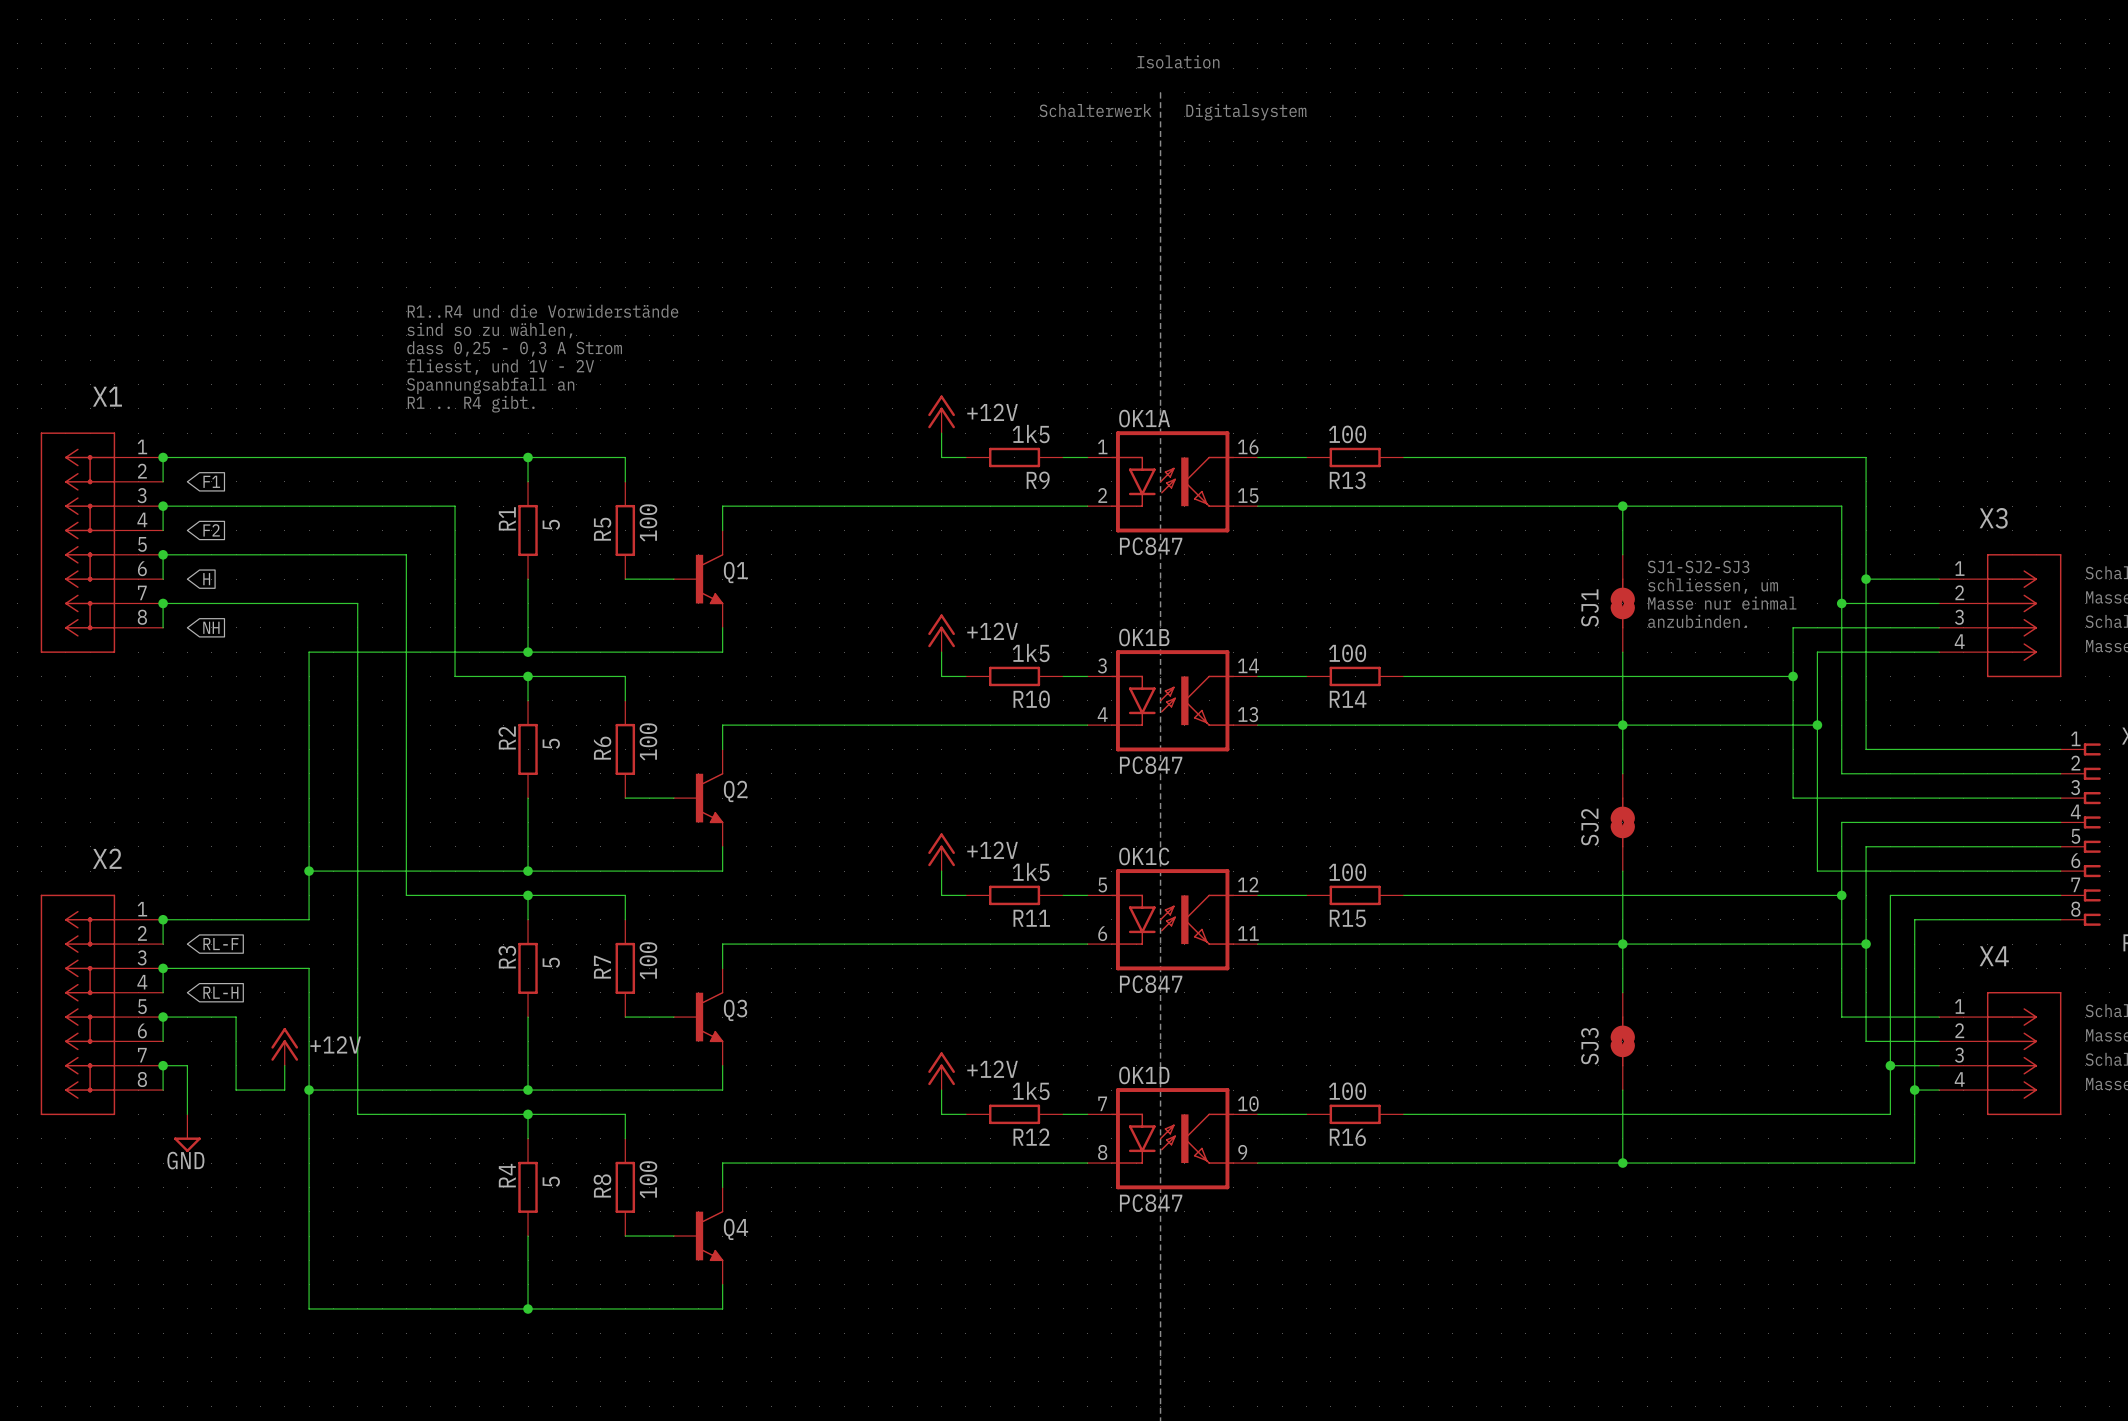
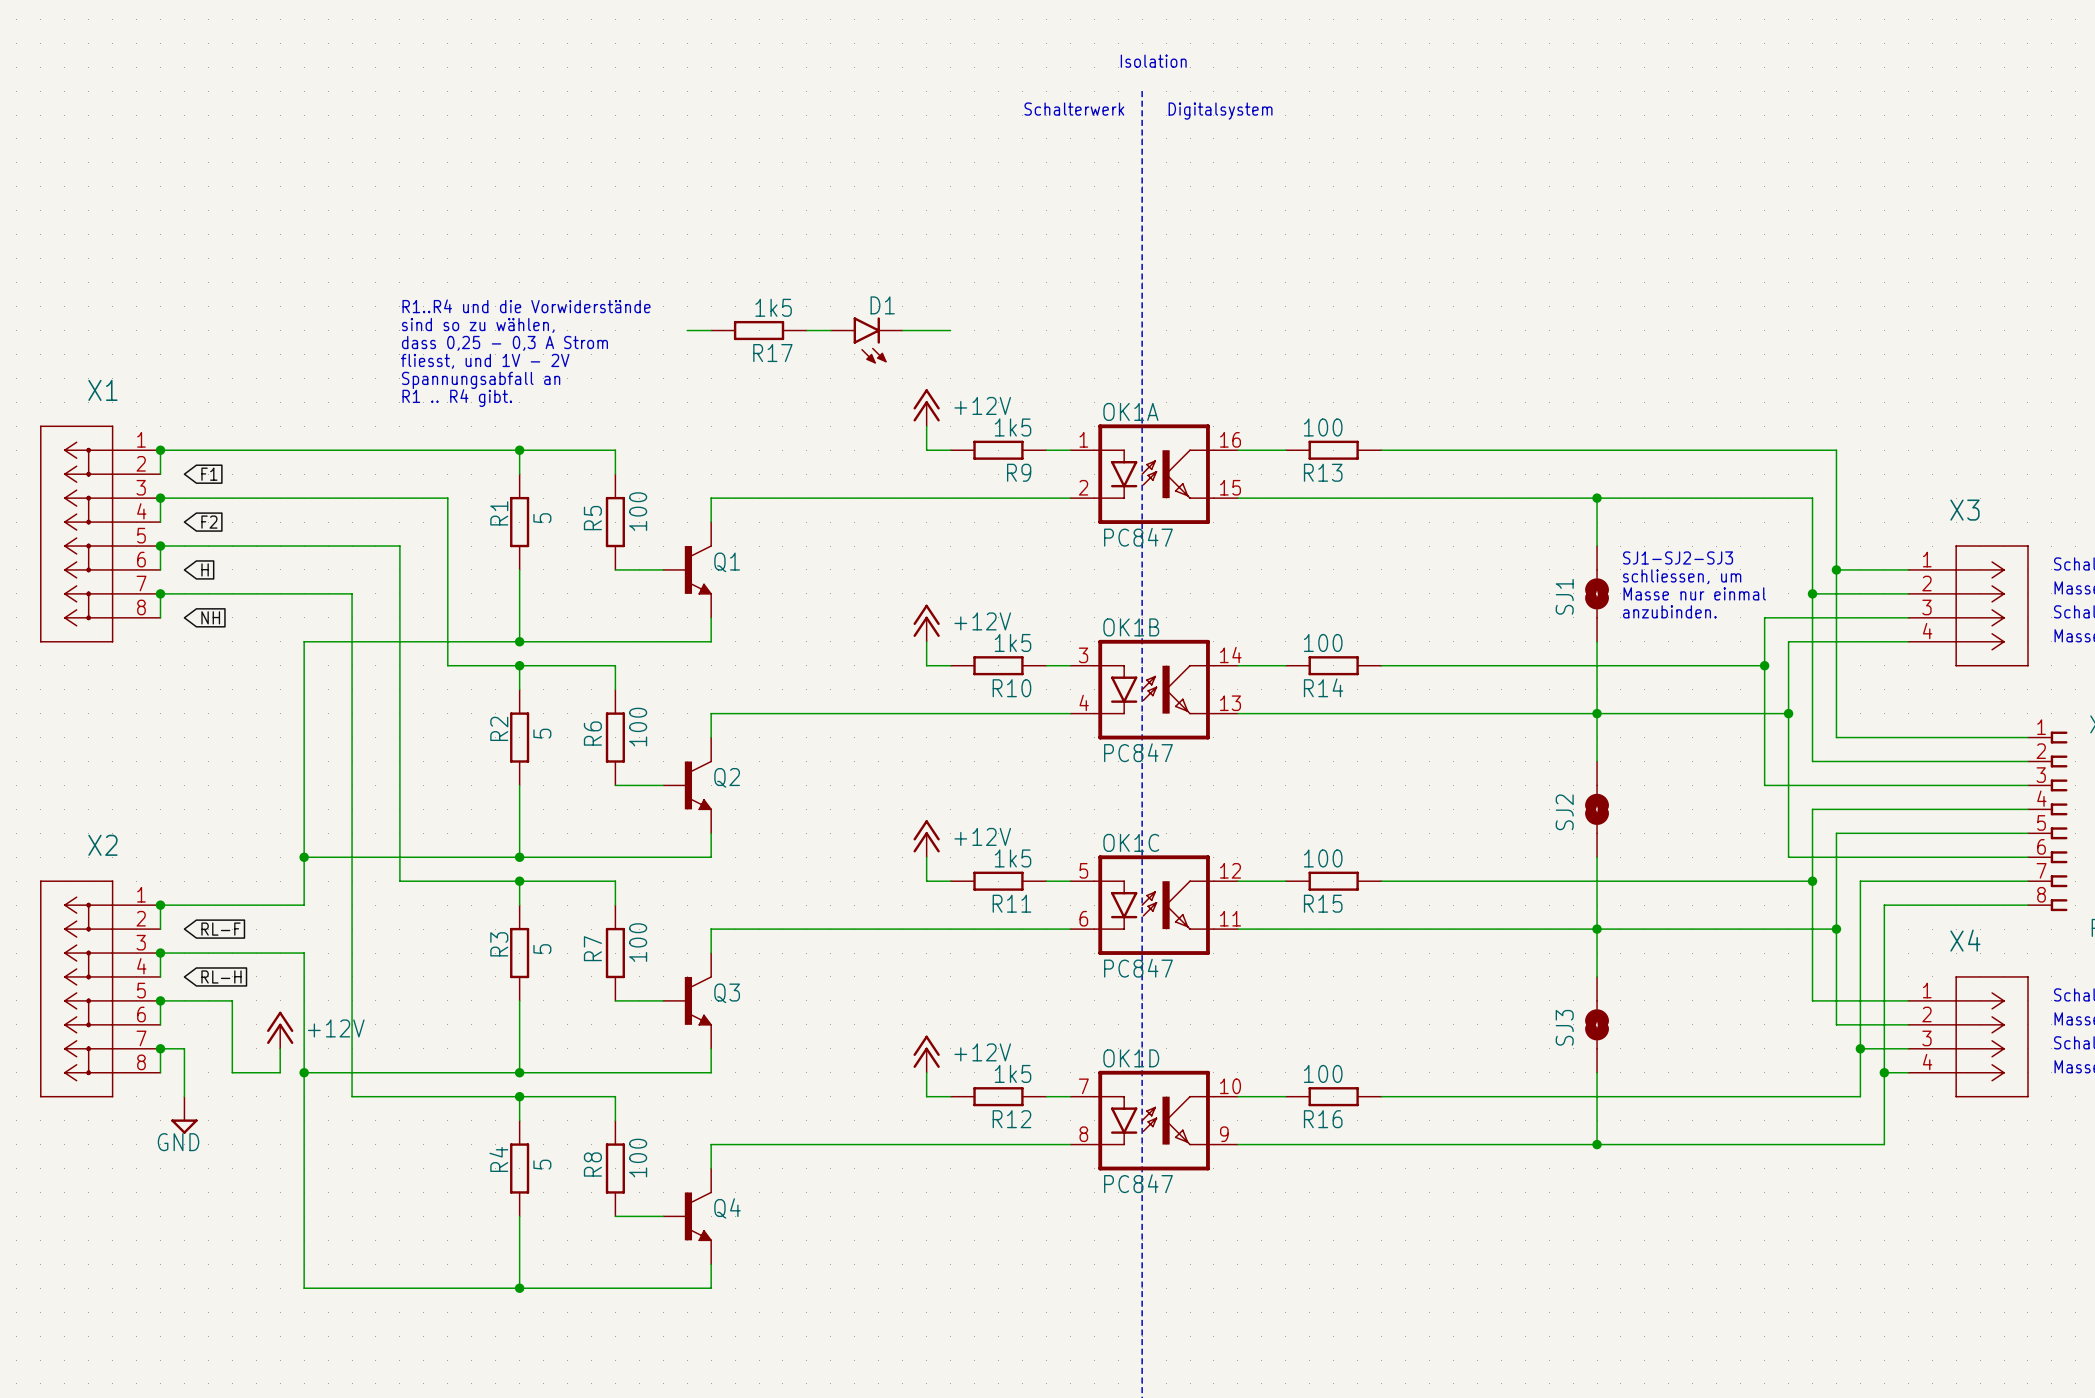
wire: none -> (687, 330) (711, 330)
R17: none -> 1k5 (759, 330)
wire: none -> (806, 330) (830, 330)
wire: none -> (902, 330) (950, 330)
D1: none -> (866, 340)

